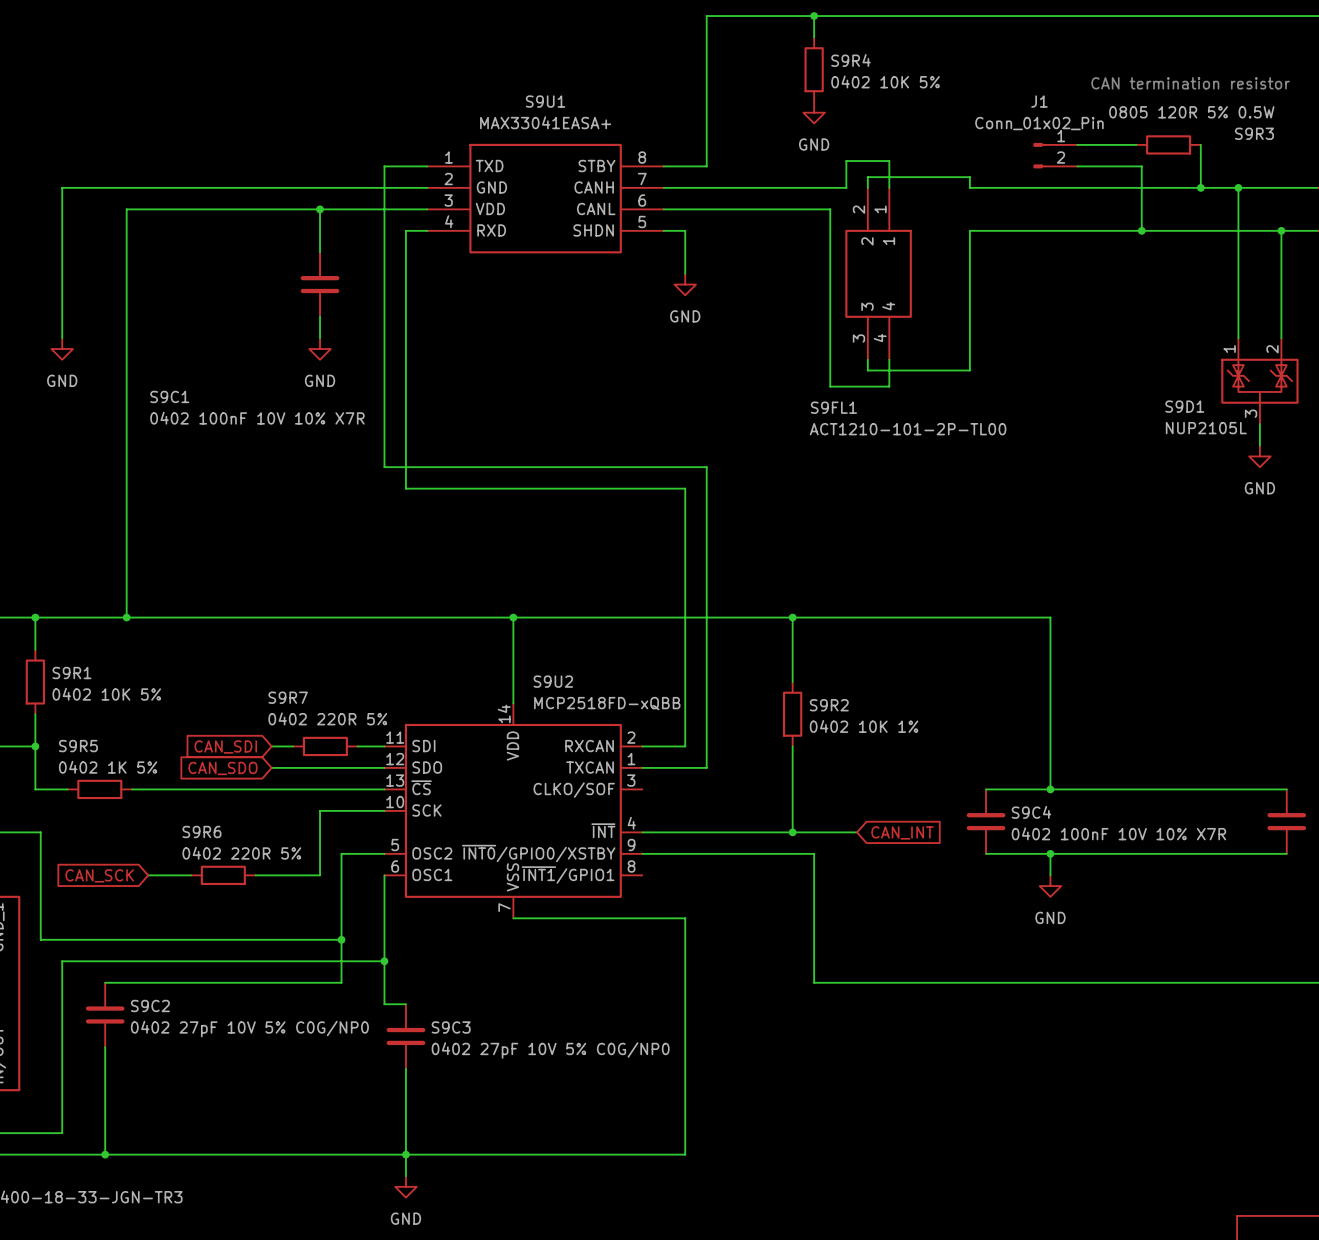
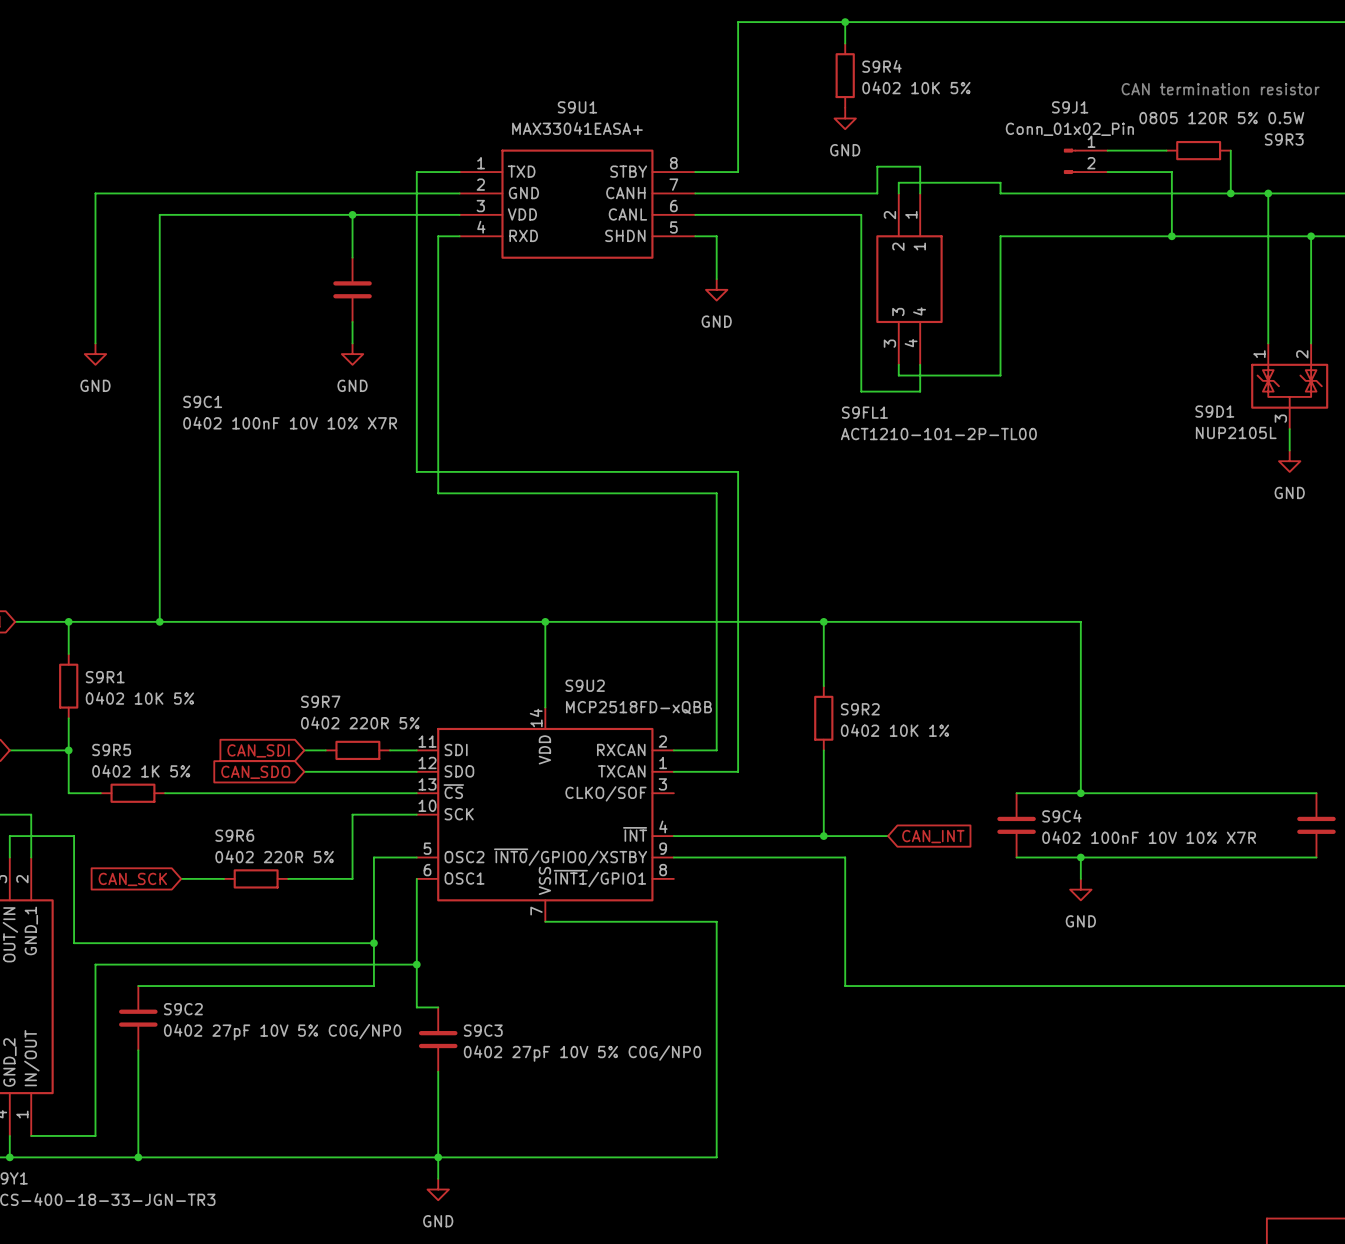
J1 name: J1 (1039, 101) -> S9J1 (1070, 107)

